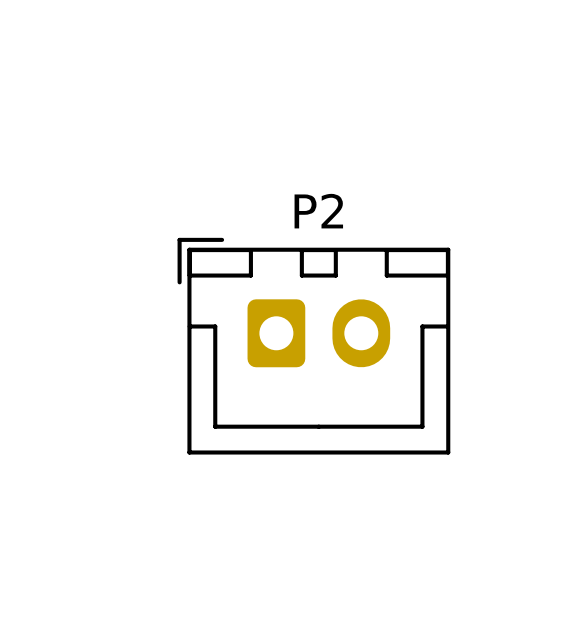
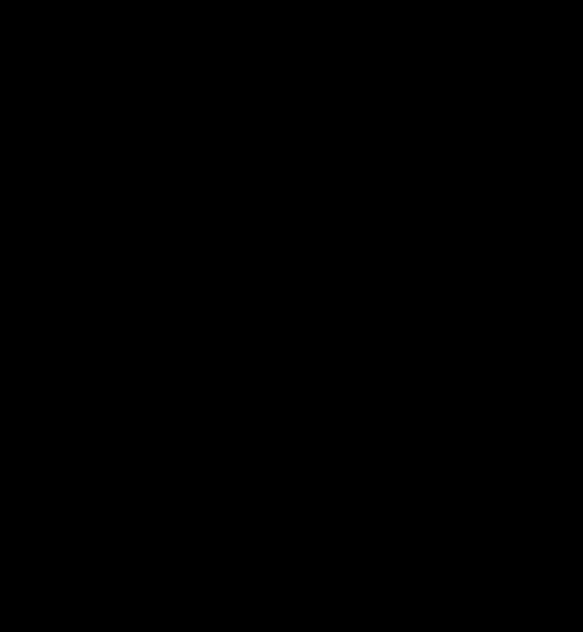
P2: (313, 346) -> none

